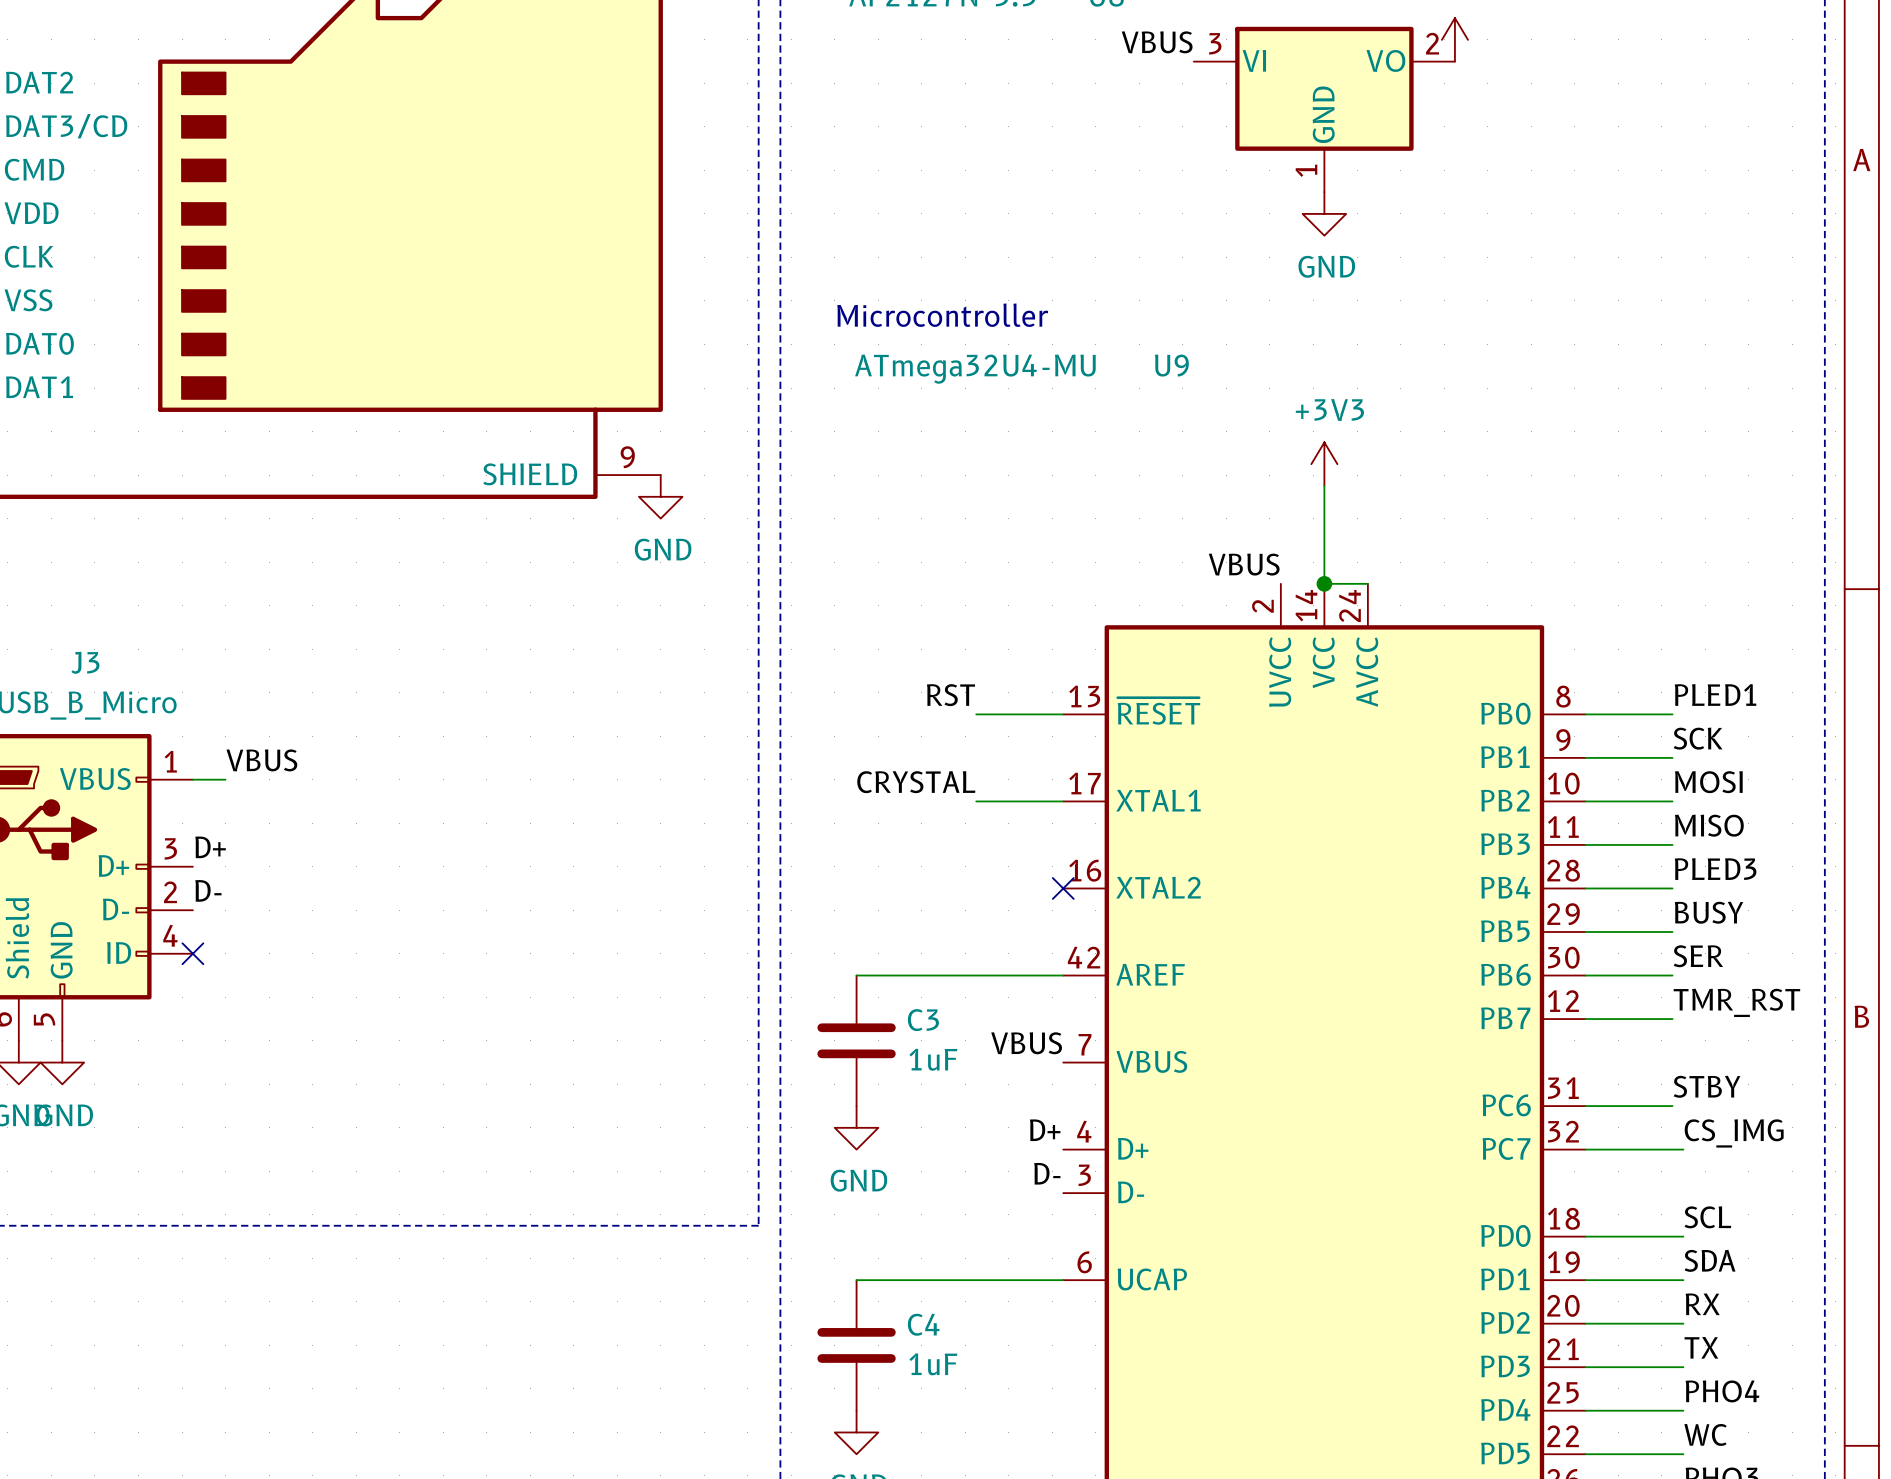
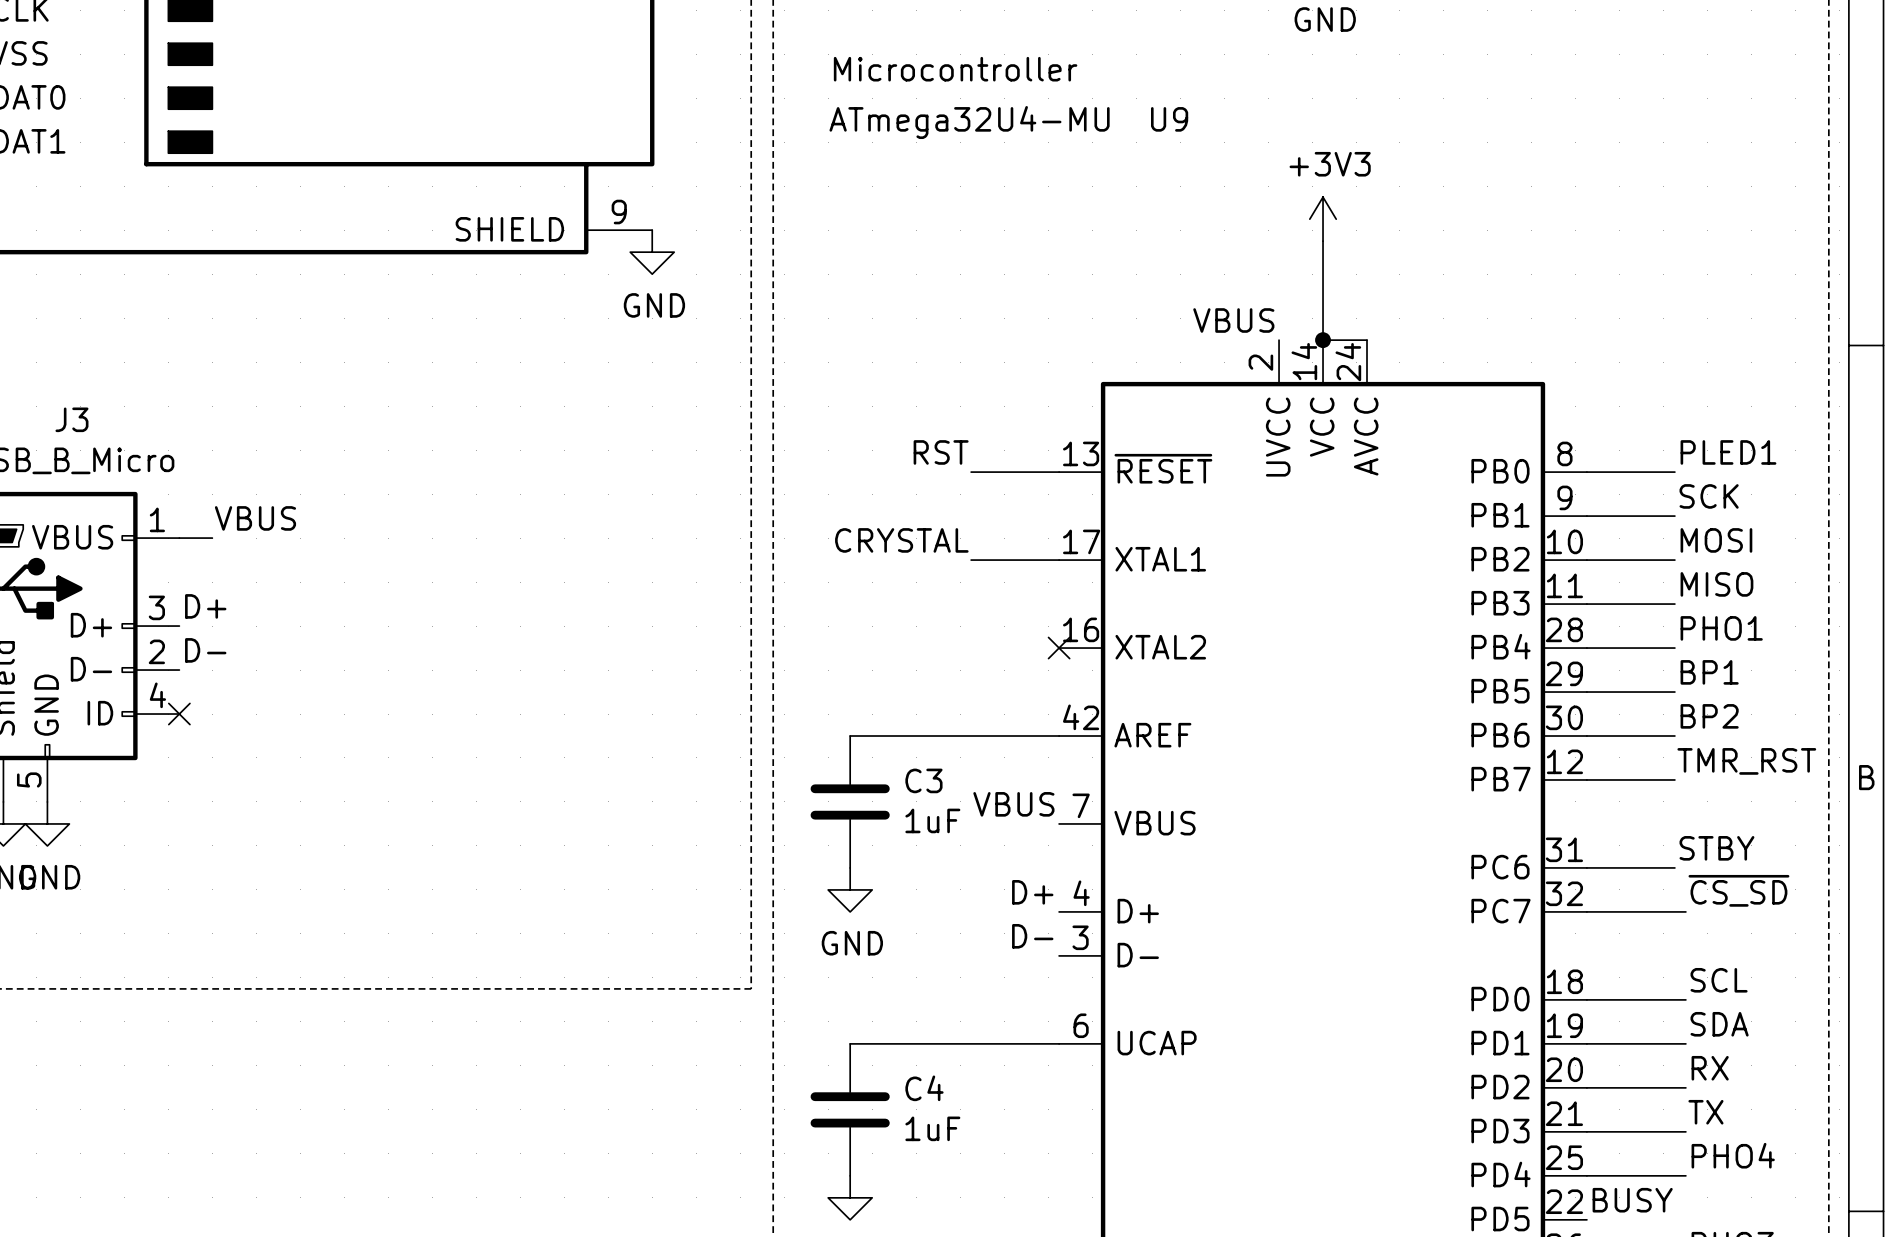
label: PLED3 (1715, 869) -> PHO1 (1721, 628)
label: BUSY (1709, 912) -> BP1 (1709, 672)
label: SER (1698, 956) -> BP2 (1709, 716)
label: CS_IMG (1734, 1133) -> ~{CS_SD} (1738, 890)
label: none -> BUSY (1632, 1200)
label: WC (1705, 1434) -> none
wire: (1585, 1454) (1683, 1454) -> none

